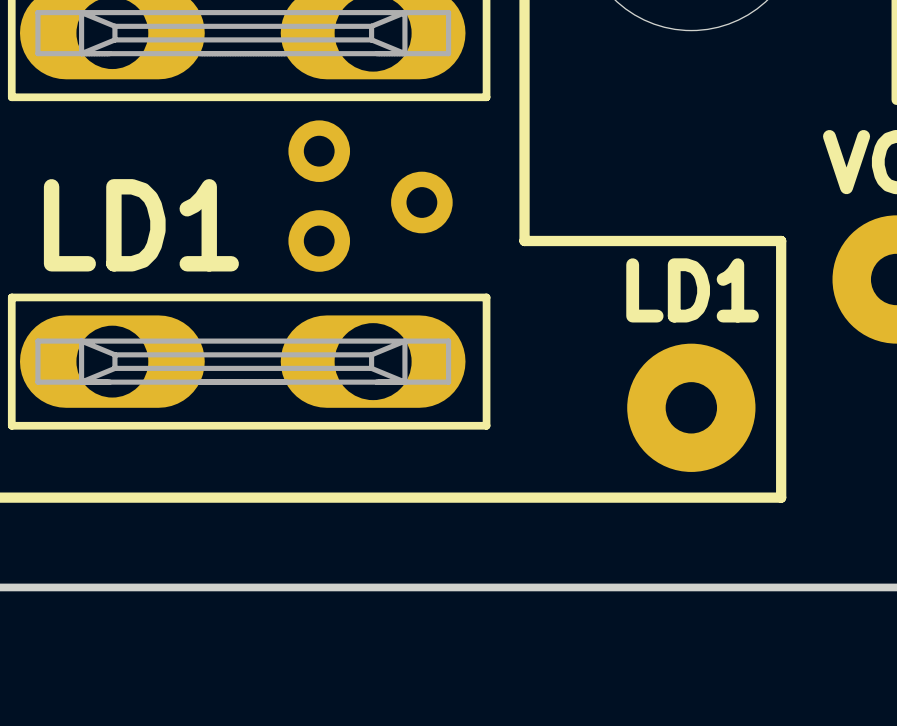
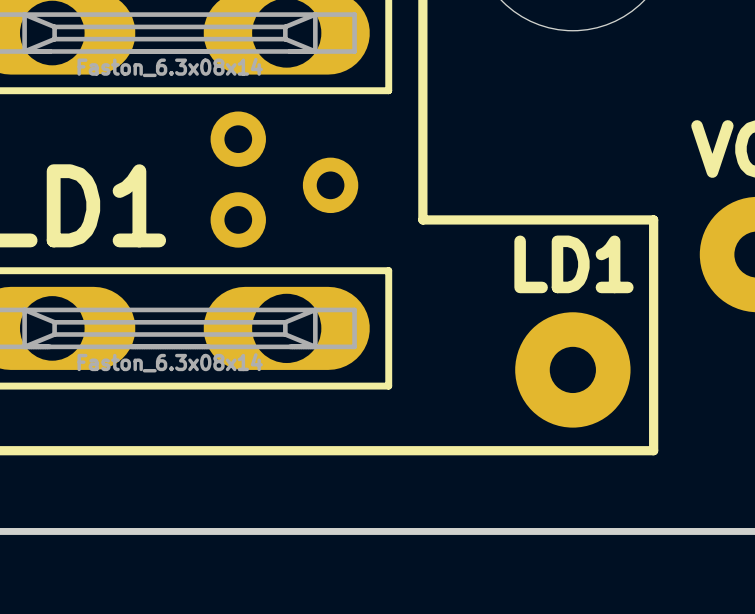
part value: none -> Faston_6.3x08x14 (170, 67)
part value: none -> Faston_6.3x08x14 (170, 362)

